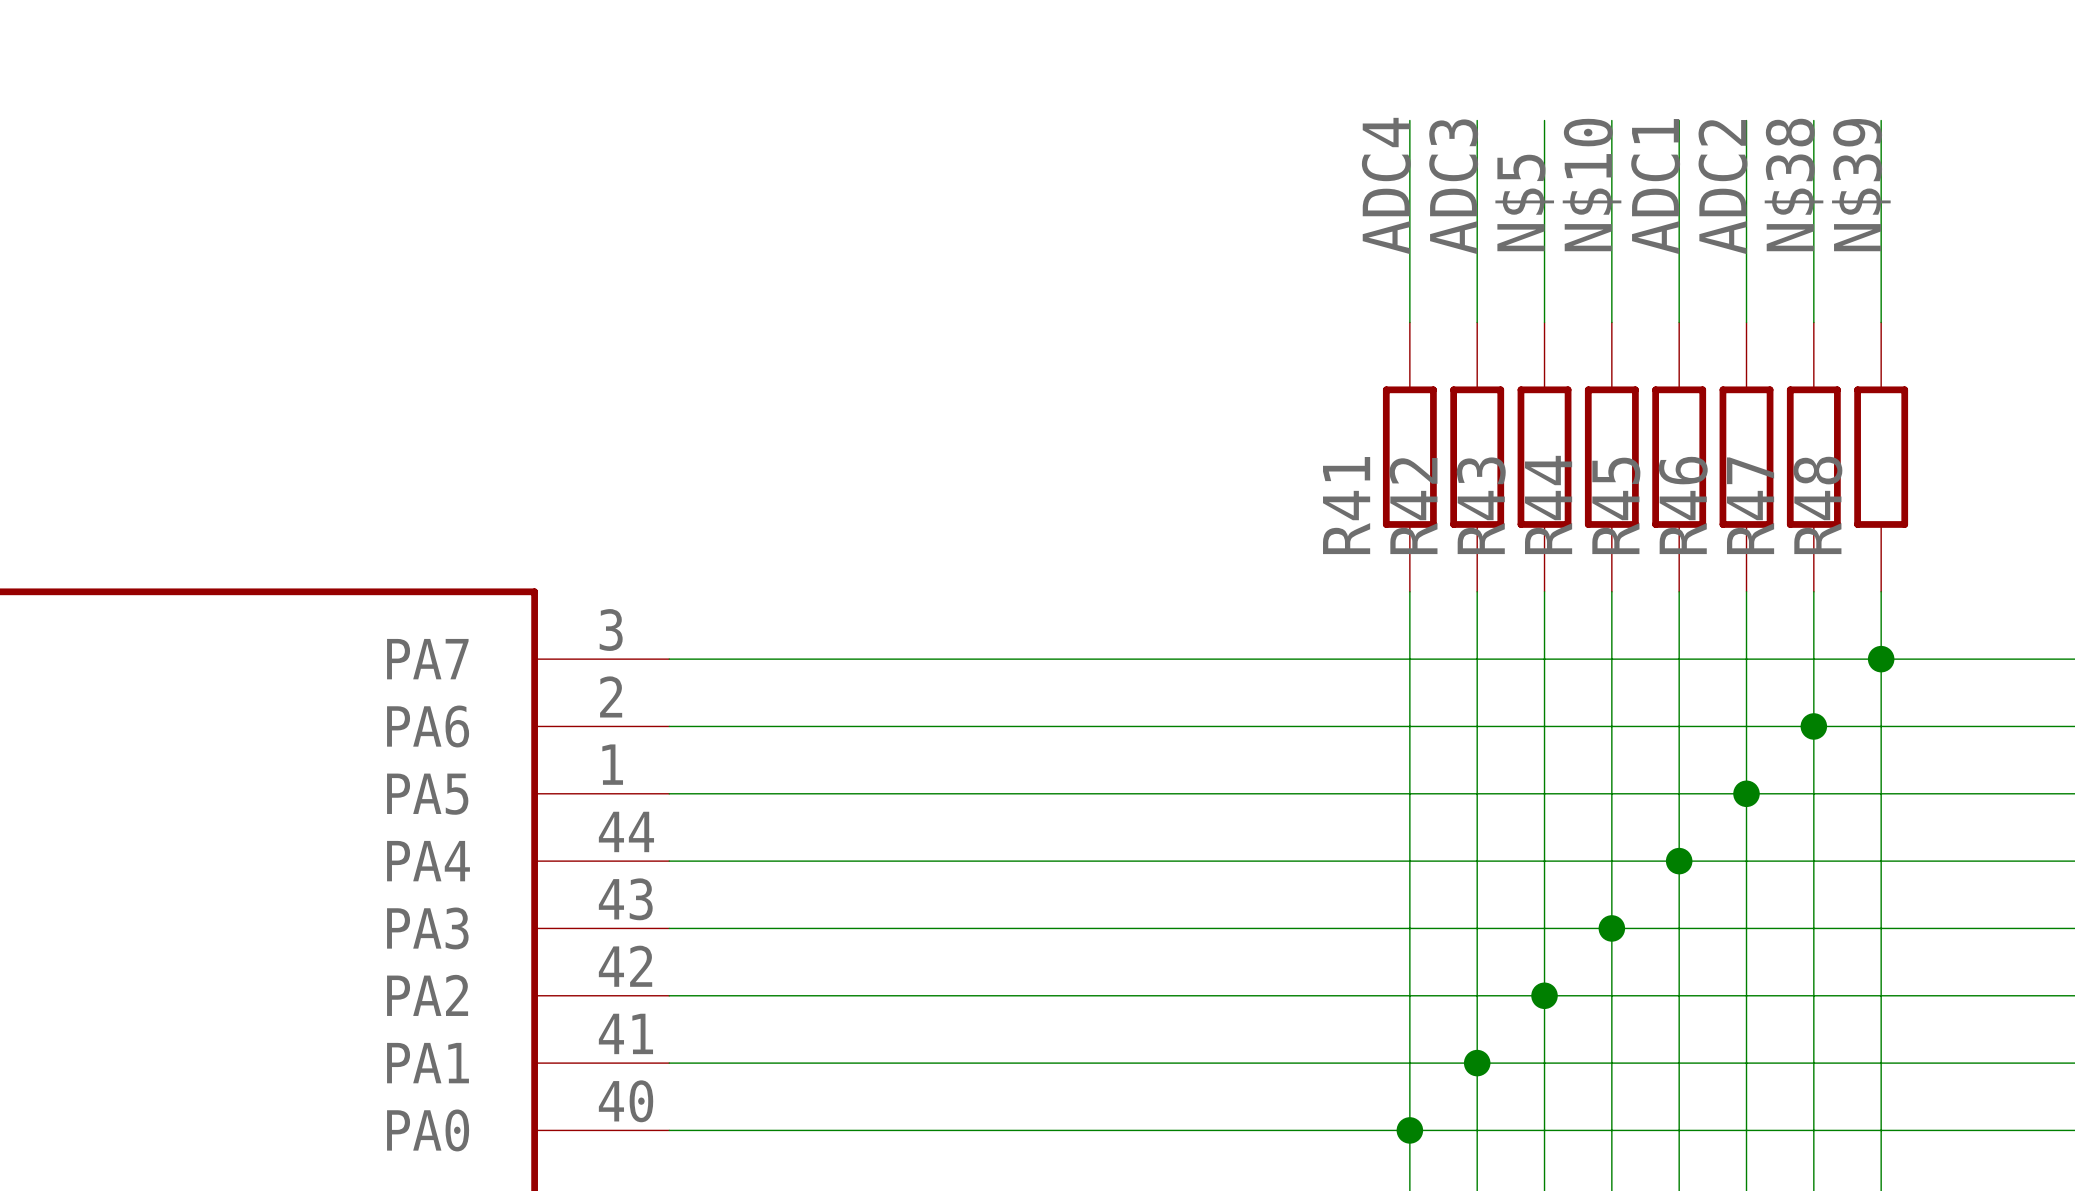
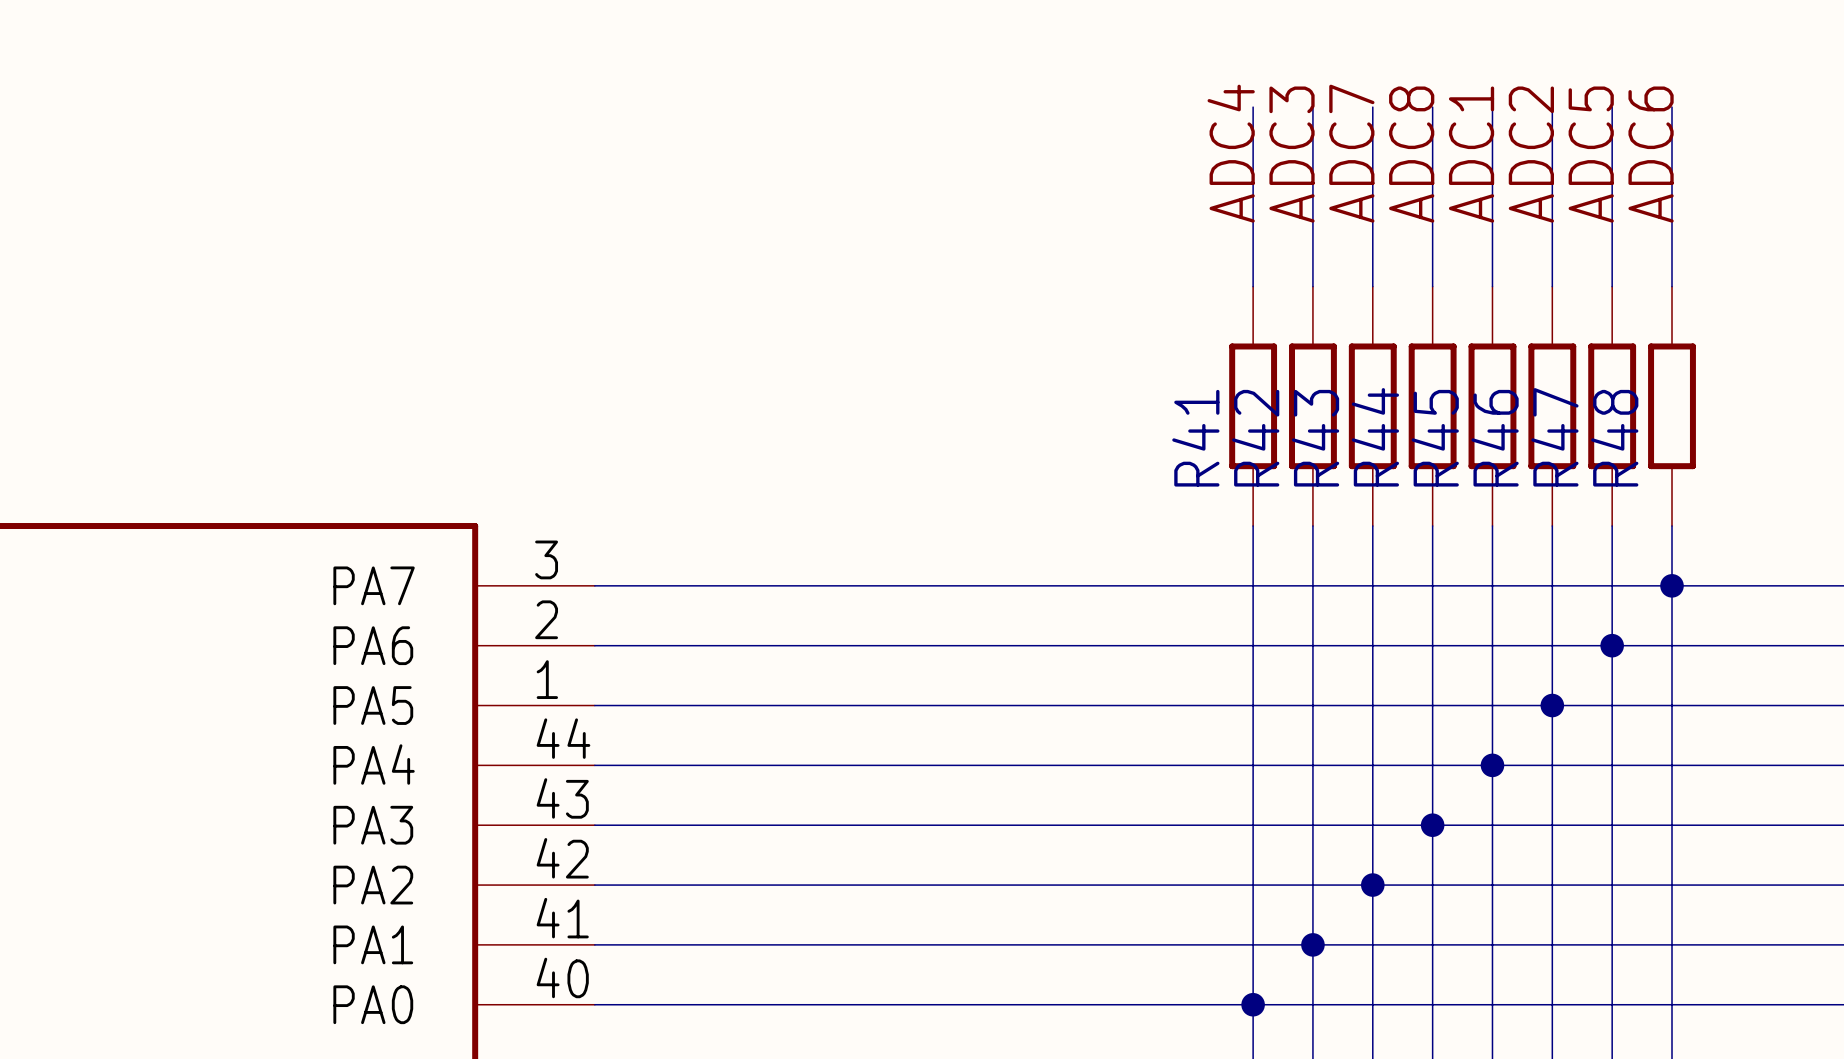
label: N$10 (1592, 185) -> ADC8 (1411, 154)
label: N$38 (1794, 185) -> ADC5 (1591, 154)
label: N$39 (1861, 185) -> ADC6 (1651, 154)
label: N$5 (1524, 202) -> ADC7 (1351, 153)

